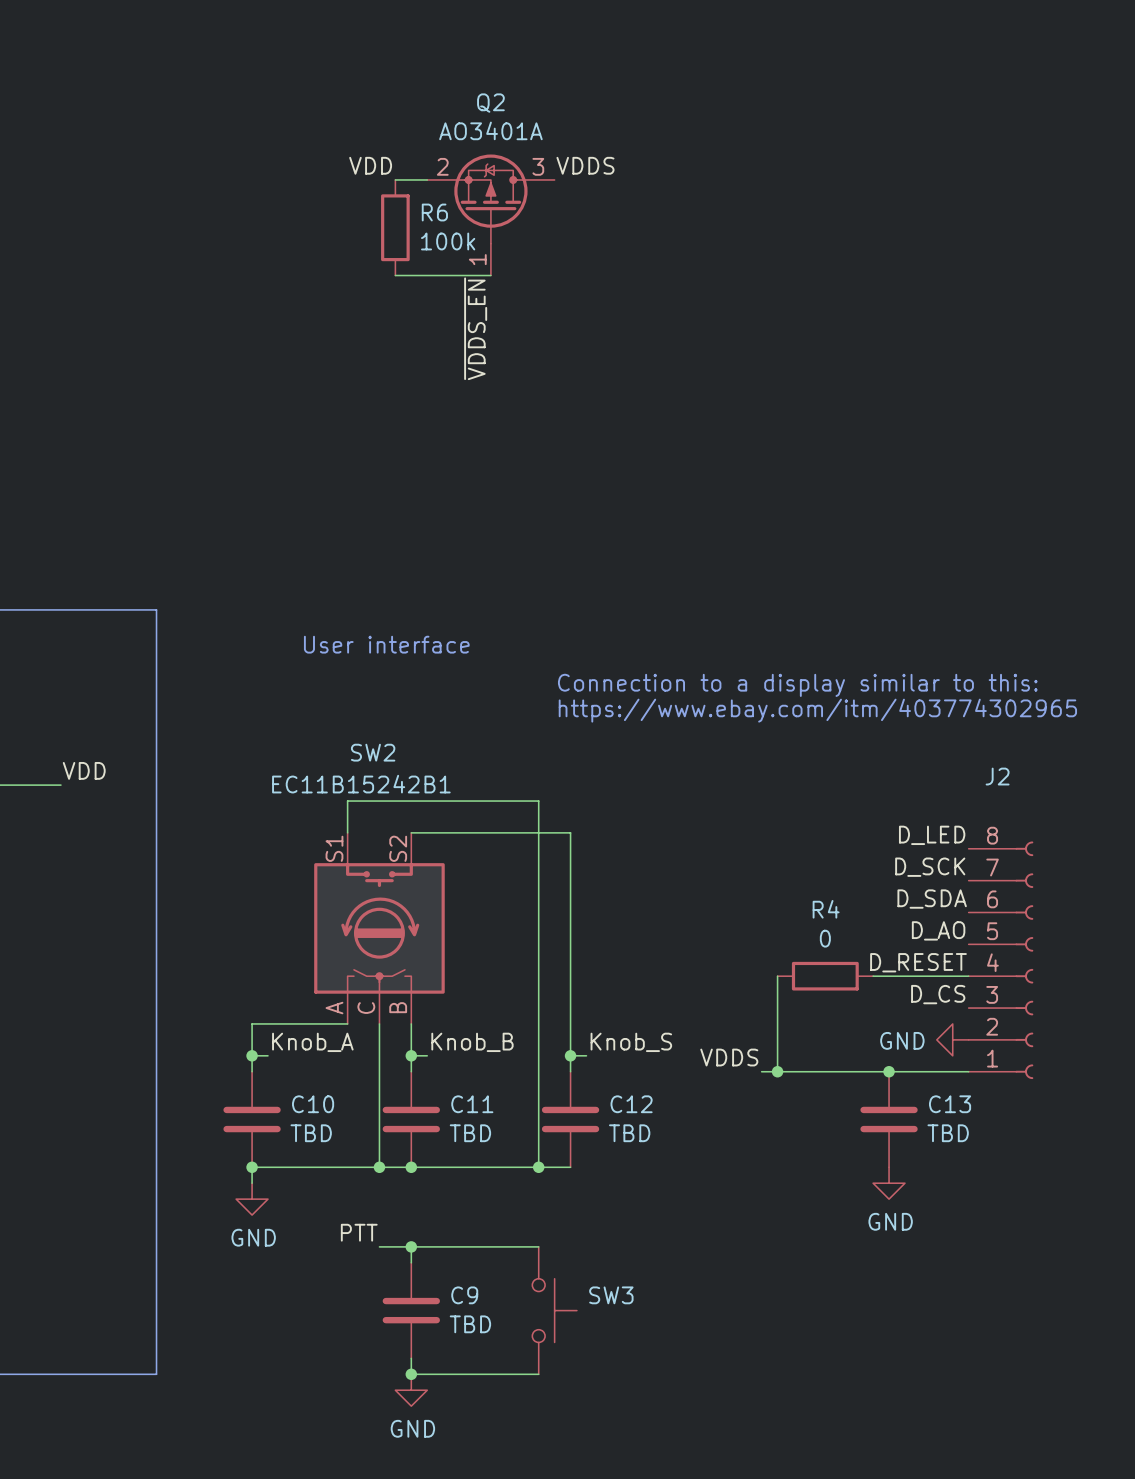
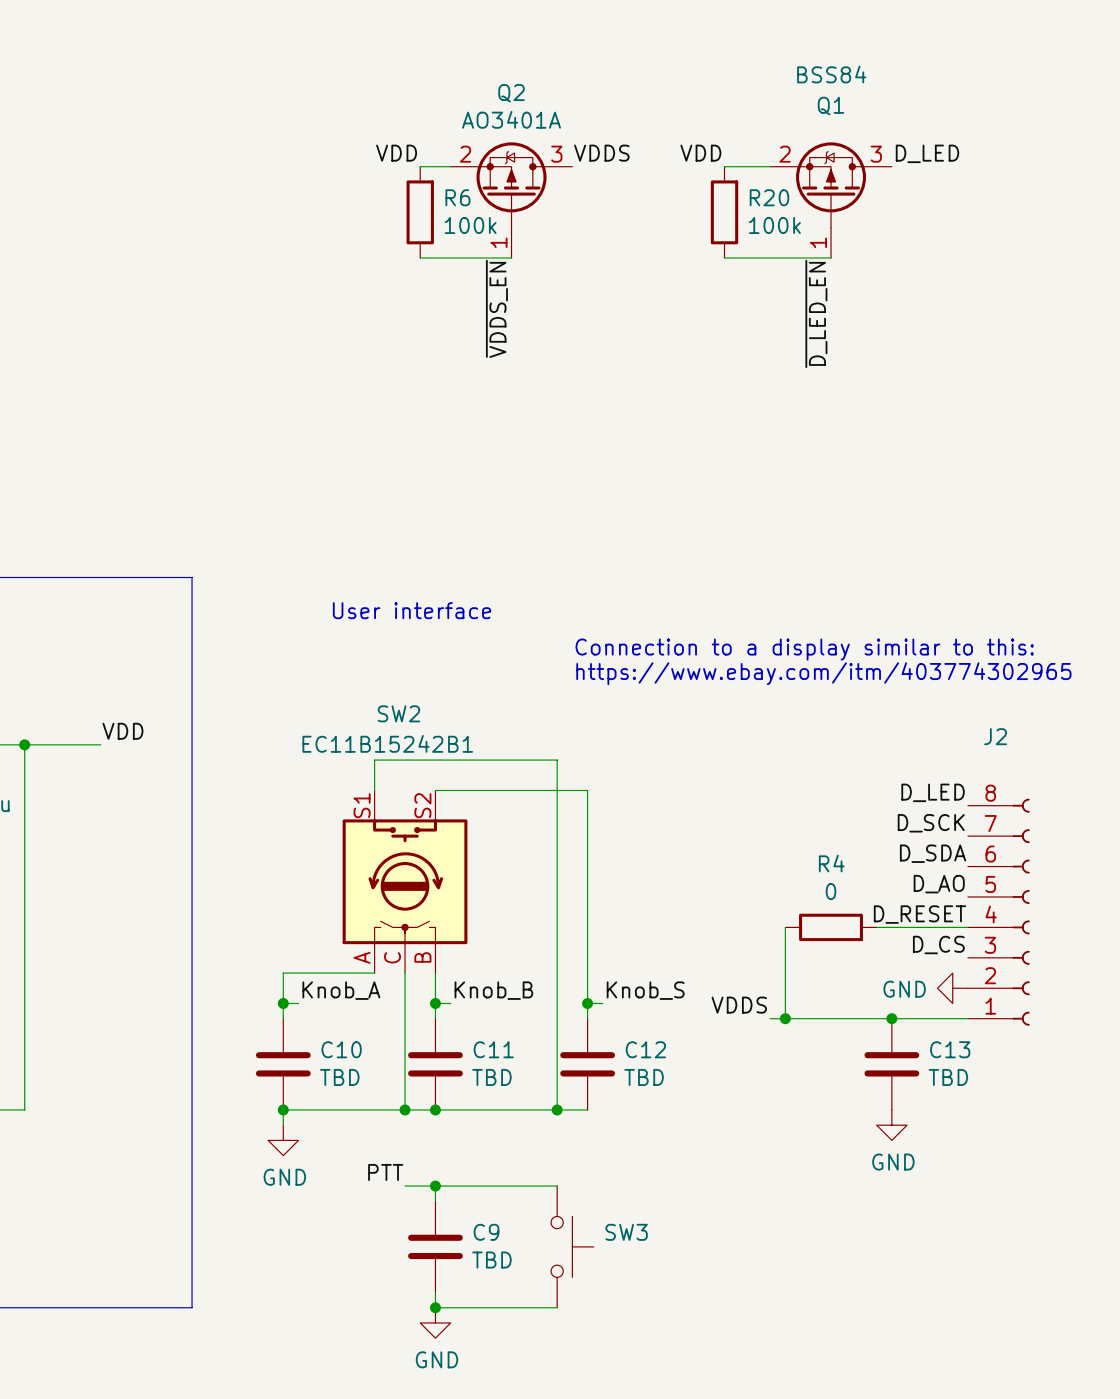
label: none -> VDD (700, 153)
label: none -> D_LED (927, 153)
wire: none -> (724, 166) (770, 166)
Q1: none -> BSS84 (831, 200)
R20: none -> 100k (724, 212)
wire: none -> (724, 258) (831, 258)
label: none -> ~{D_LED_EN} (816, 313)

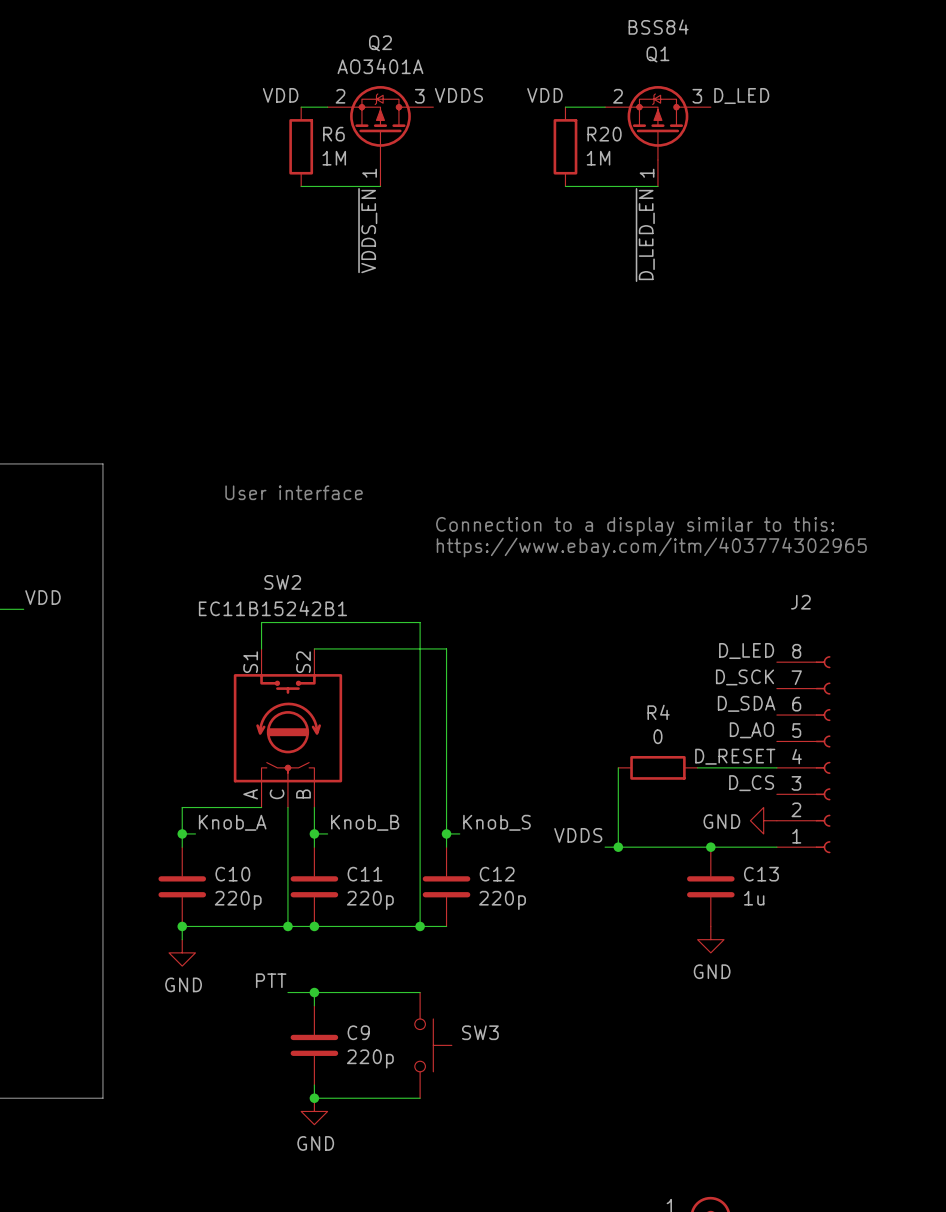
R6 value: 100k (470, 225) -> 1M (334, 158)
R20 value: 100k (774, 225) -> 1M (598, 158)
C10 value: TBD (339, 1077) -> 220p (238, 900)
C11 value: TBD (491, 1077) -> 220p (370, 900)
C12 value: TBD (644, 1077) -> 220p (502, 900)
C13 value: TBD (948, 1077) -> 1u (754, 898)
C9 value: TBD (491, 1260) -> 220p (370, 1058)

